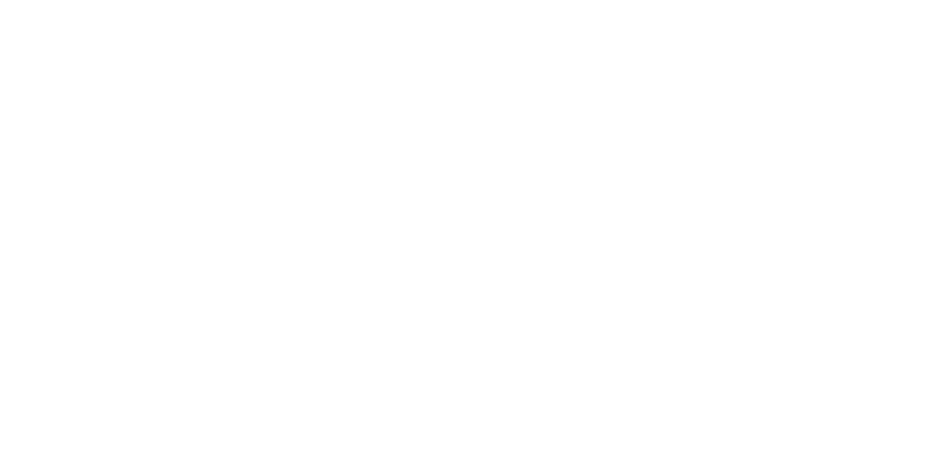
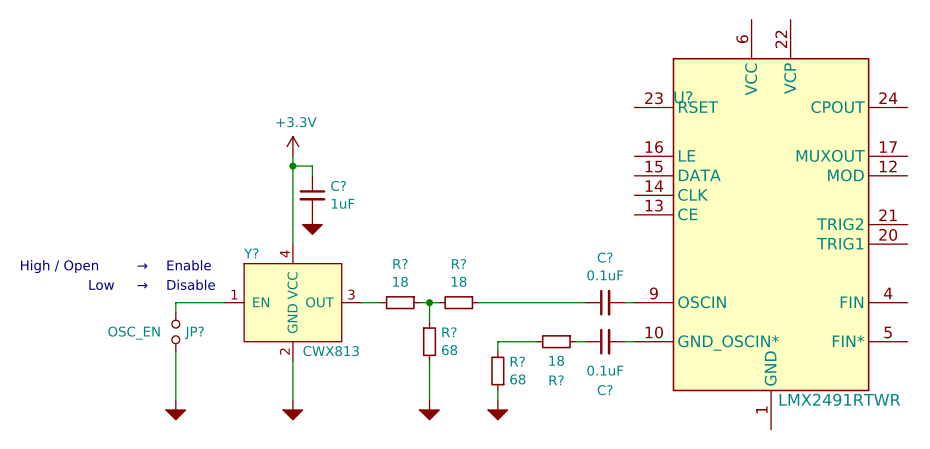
power symbol: none -> +3.3V (292, 146)
wire: none -> (292, 156) (292, 244)
wire: none -> (292, 166) (312, 166) (312, 175)
junction: none -> (292, 166)
C?: none -> 1uF (312, 195)
power symbol: none -> (312, 224)
U?: none -> LMX2491RTWR (771, 224)
text: none -> Enable (189, 265)
text: none -> High / Open (59, 266)
text: none -> → (142, 266)
text: none -> Disable (191, 284)
text: none -> Low (101, 285)
text: none -> → (142, 285)
wire: none -> (224, 302) (175, 302) (175, 312)
Y?: none -> CWX813 (292, 302)
wire: none -> (361, 302) (380, 302)
R?: none -> 18 (400, 302)
wire: none -> (419, 302) (439, 302)
wire: none -> (429, 302) (429, 322)
junction: none -> (429, 302)
R?: none -> 18 (458, 302)
wire: none -> (478, 302) (585, 302)
C?: none -> 0.1uF (605, 302)
wire: none -> (624, 302) (634, 302)
JP?: none -> OSC_EN (175, 331)
R?: none -> 68 (429, 341)
wire: none -> (536, 341) (497, 341) (497, 351)
R?: none -> 18 (556, 341)
wire: none -> (575, 341) (585, 341)
C?: none -> 0.1uF (605, 341)
wire: none -> (624, 341) (634, 341)
wire: none -> (175, 351) (175, 400)
wire: none -> (292, 361) (292, 400)
wire: none -> (429, 361) (429, 400)
R?: none -> 68 (497, 370)
wire: none -> (497, 390) (497, 400)
power symbol: none -> (175, 410)
power symbol: none -> (292, 410)
power symbol: none -> (429, 410)
power symbol: none -> (497, 410)

